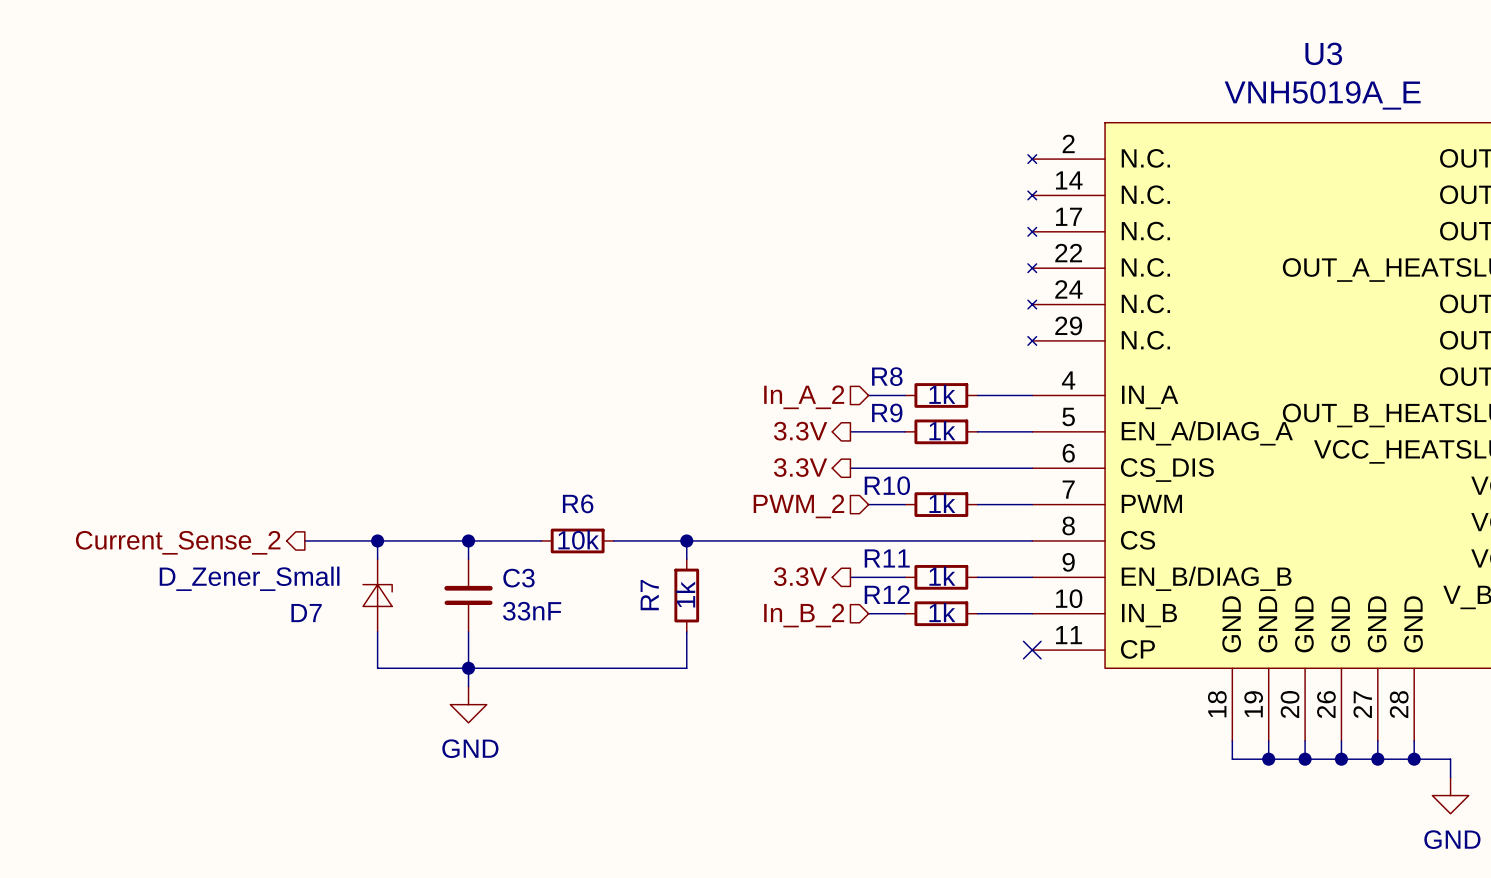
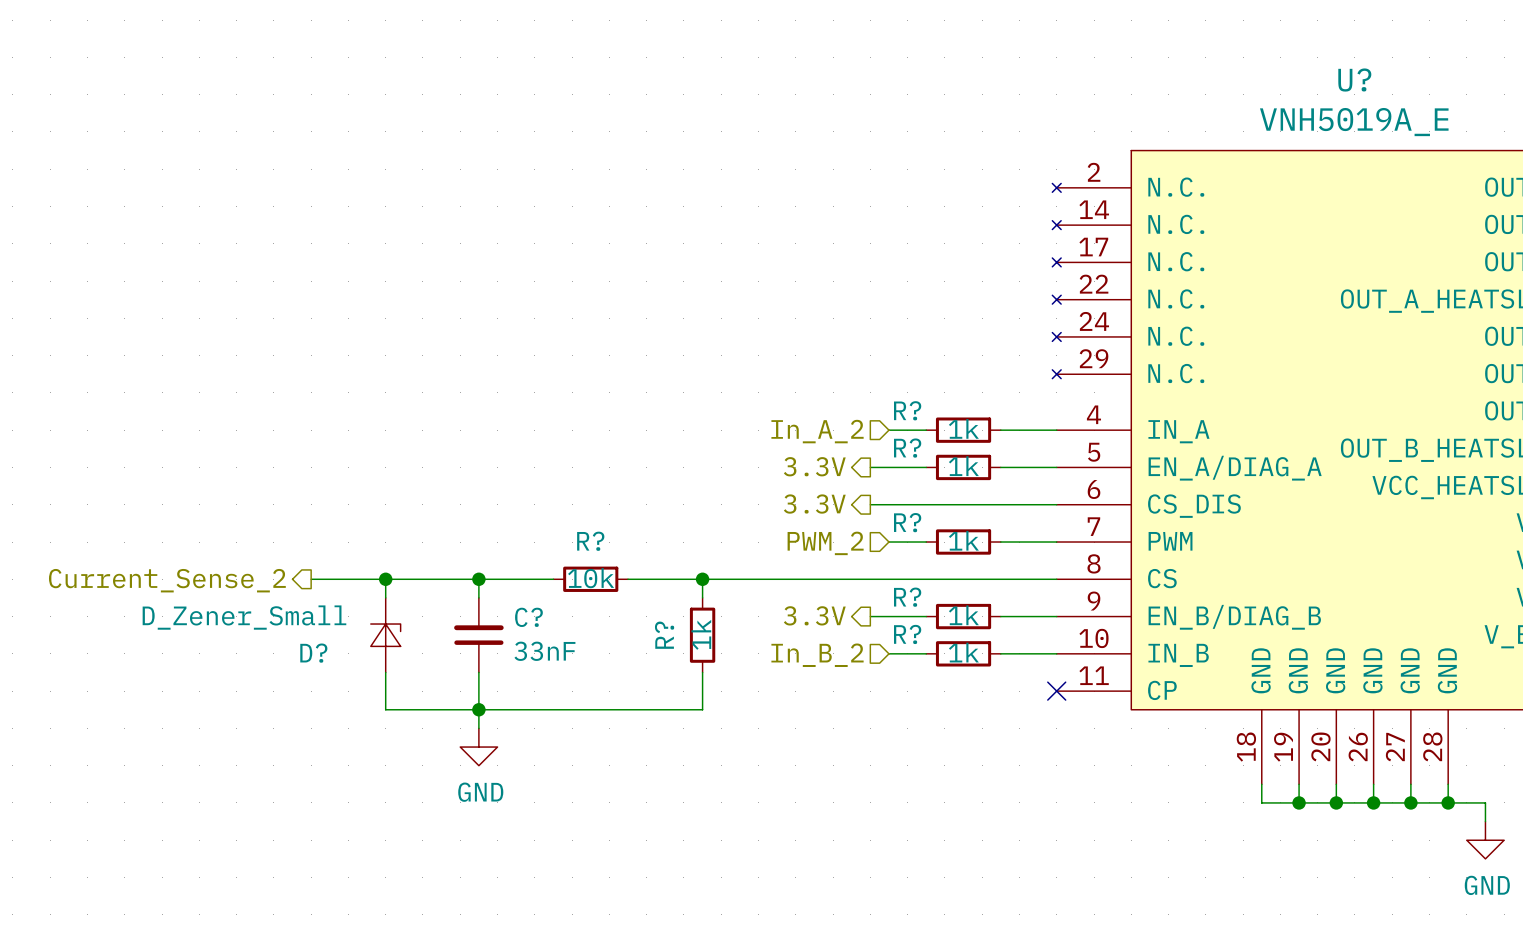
U3 name: U3 (1323, 53) -> U? (1354, 80)
R8 name: R8 (887, 376) -> R? (907, 410)
R9 name: R9 (887, 412) -> R? (907, 448)
R10 name: R10 (887, 485) -> R? (907, 522)
R6 name: R6 (578, 503) -> R? (590, 541)
R11 name: R11 (887, 558) -> R? (907, 597)
C3 name: C3 (518, 578) -> C? (528, 617)
R12 name: R12 (887, 594) -> R? (907, 634)
R7 name: R7 (649, 595) -> R? (664, 635)
D7 name: D7 (306, 613) -> D? (313, 653)

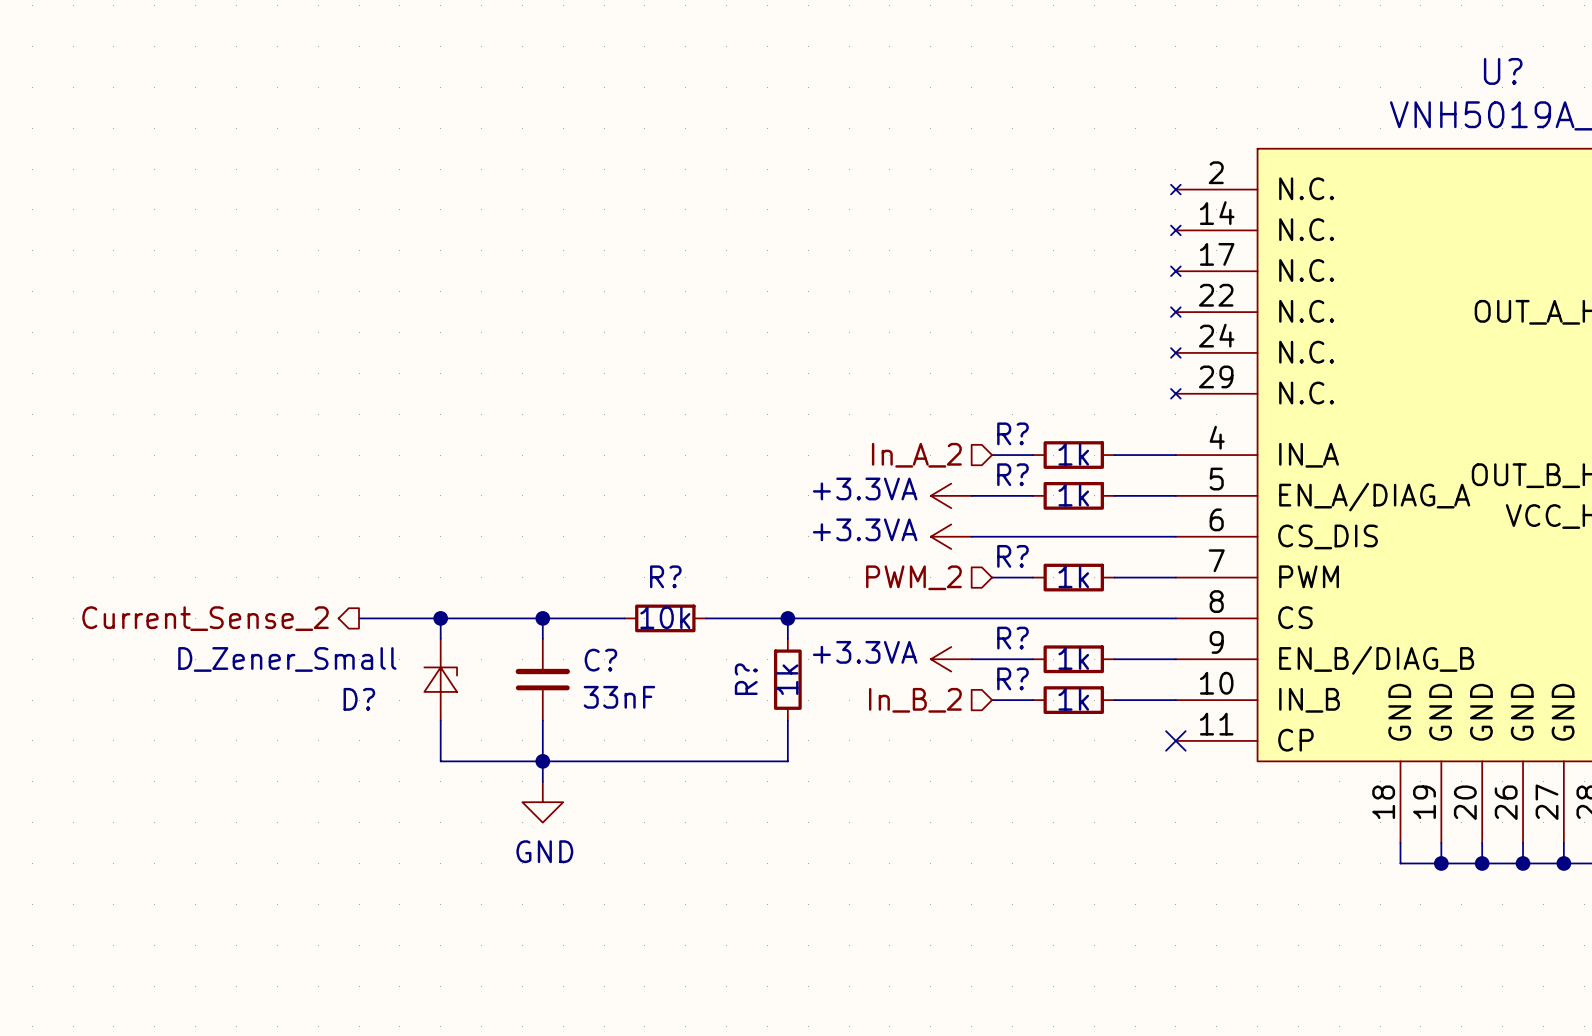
hierarchical label: 3.3V (814, 466) -> none
power symbol: none -> +3.3VA (951, 495)
hierarchical label: 3.3V (814, 504) -> none
power symbol: none -> +3.3VA (951, 536)
hierarchical label: 3.3V (814, 615) -> none
power symbol: none -> +3.3VA (951, 659)

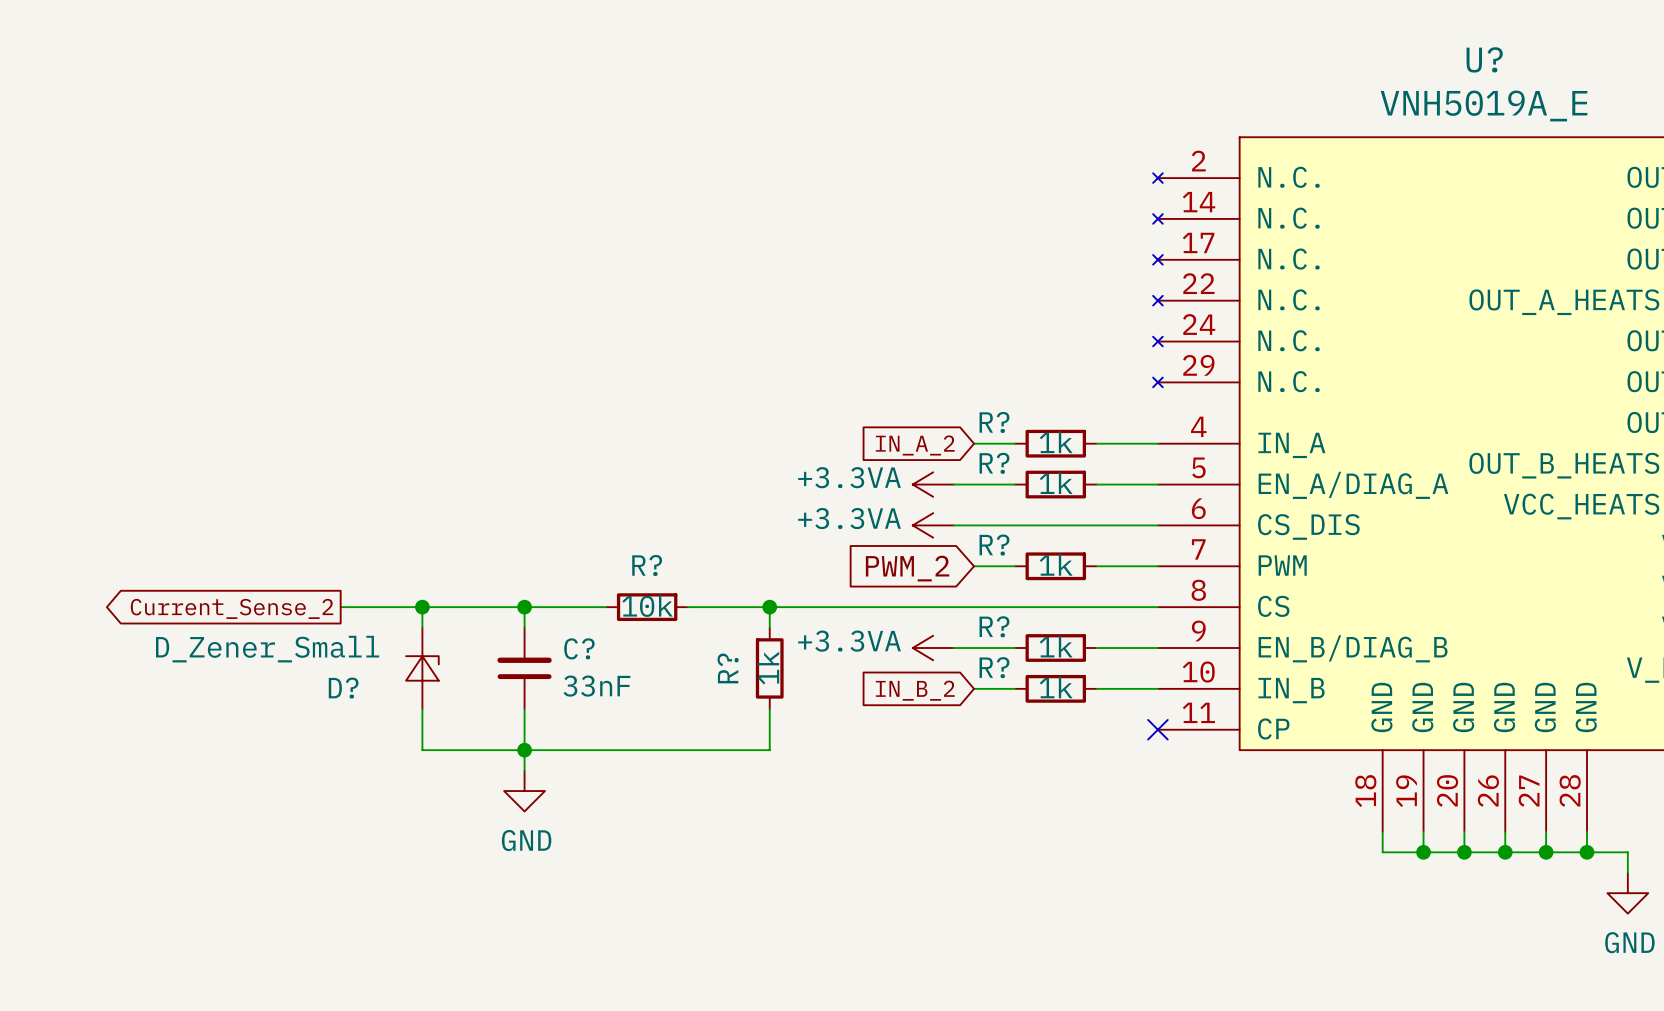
hierarchical label: In_A_2 (916, 455) -> none
global label: none -> IN_A_2 (915, 445)
hierarchical label: PWM_2 (913, 577) -> none
global label: none -> PWM_2 (907, 568)
hierarchical label: Current_Sense_2 (205, 618) -> none
global label: none -> Current_Sense_2 (232, 608)
hierarchical label: In_B_2 (915, 700) -> none
global label: none -> IN_B_2 (915, 690)

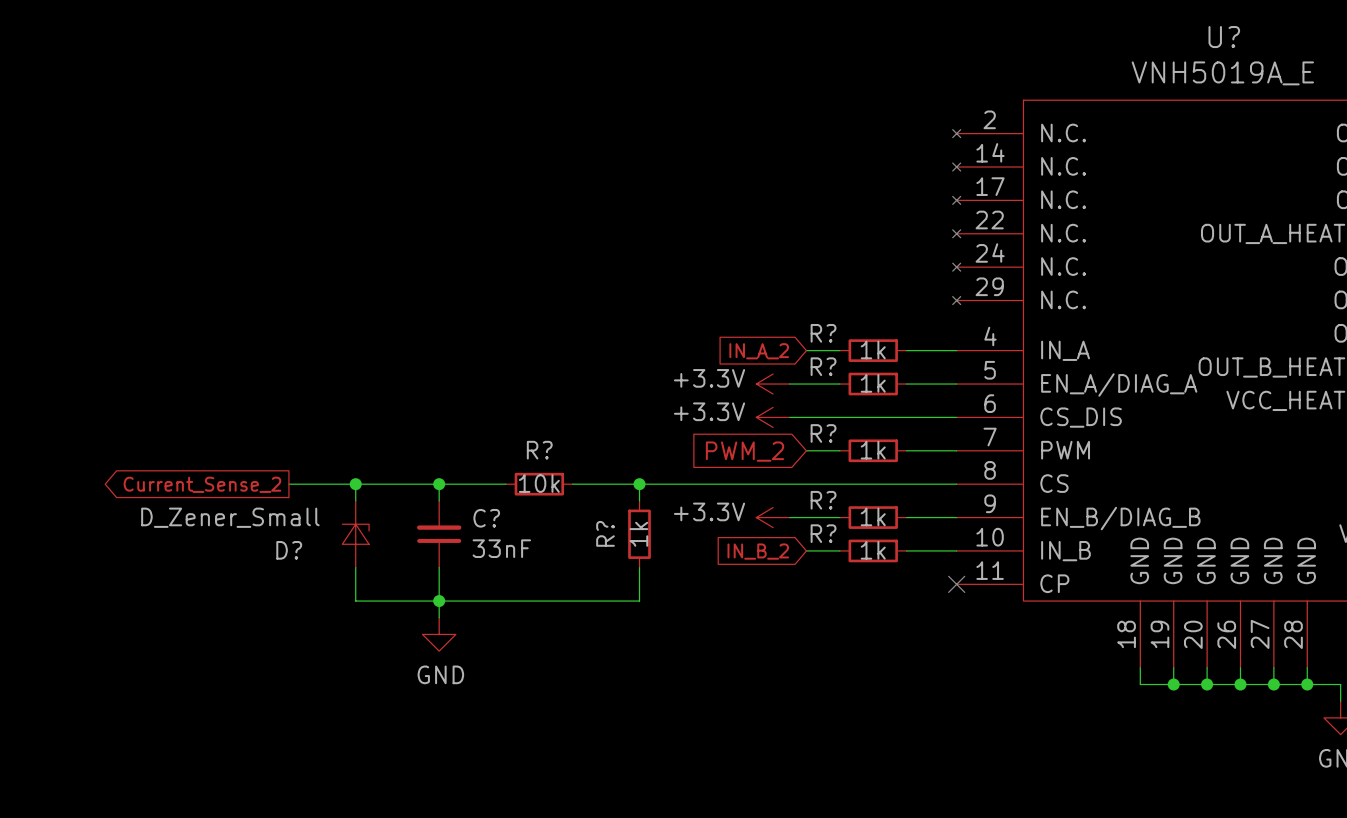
power symbol: +3.3VA (933, 484) -> +3.3V (773, 384)
power symbol: +3.3VA (933, 525) -> +3.3V (773, 417)
power symbol: +3.3VA (933, 648) -> +3.3V (773, 517)

